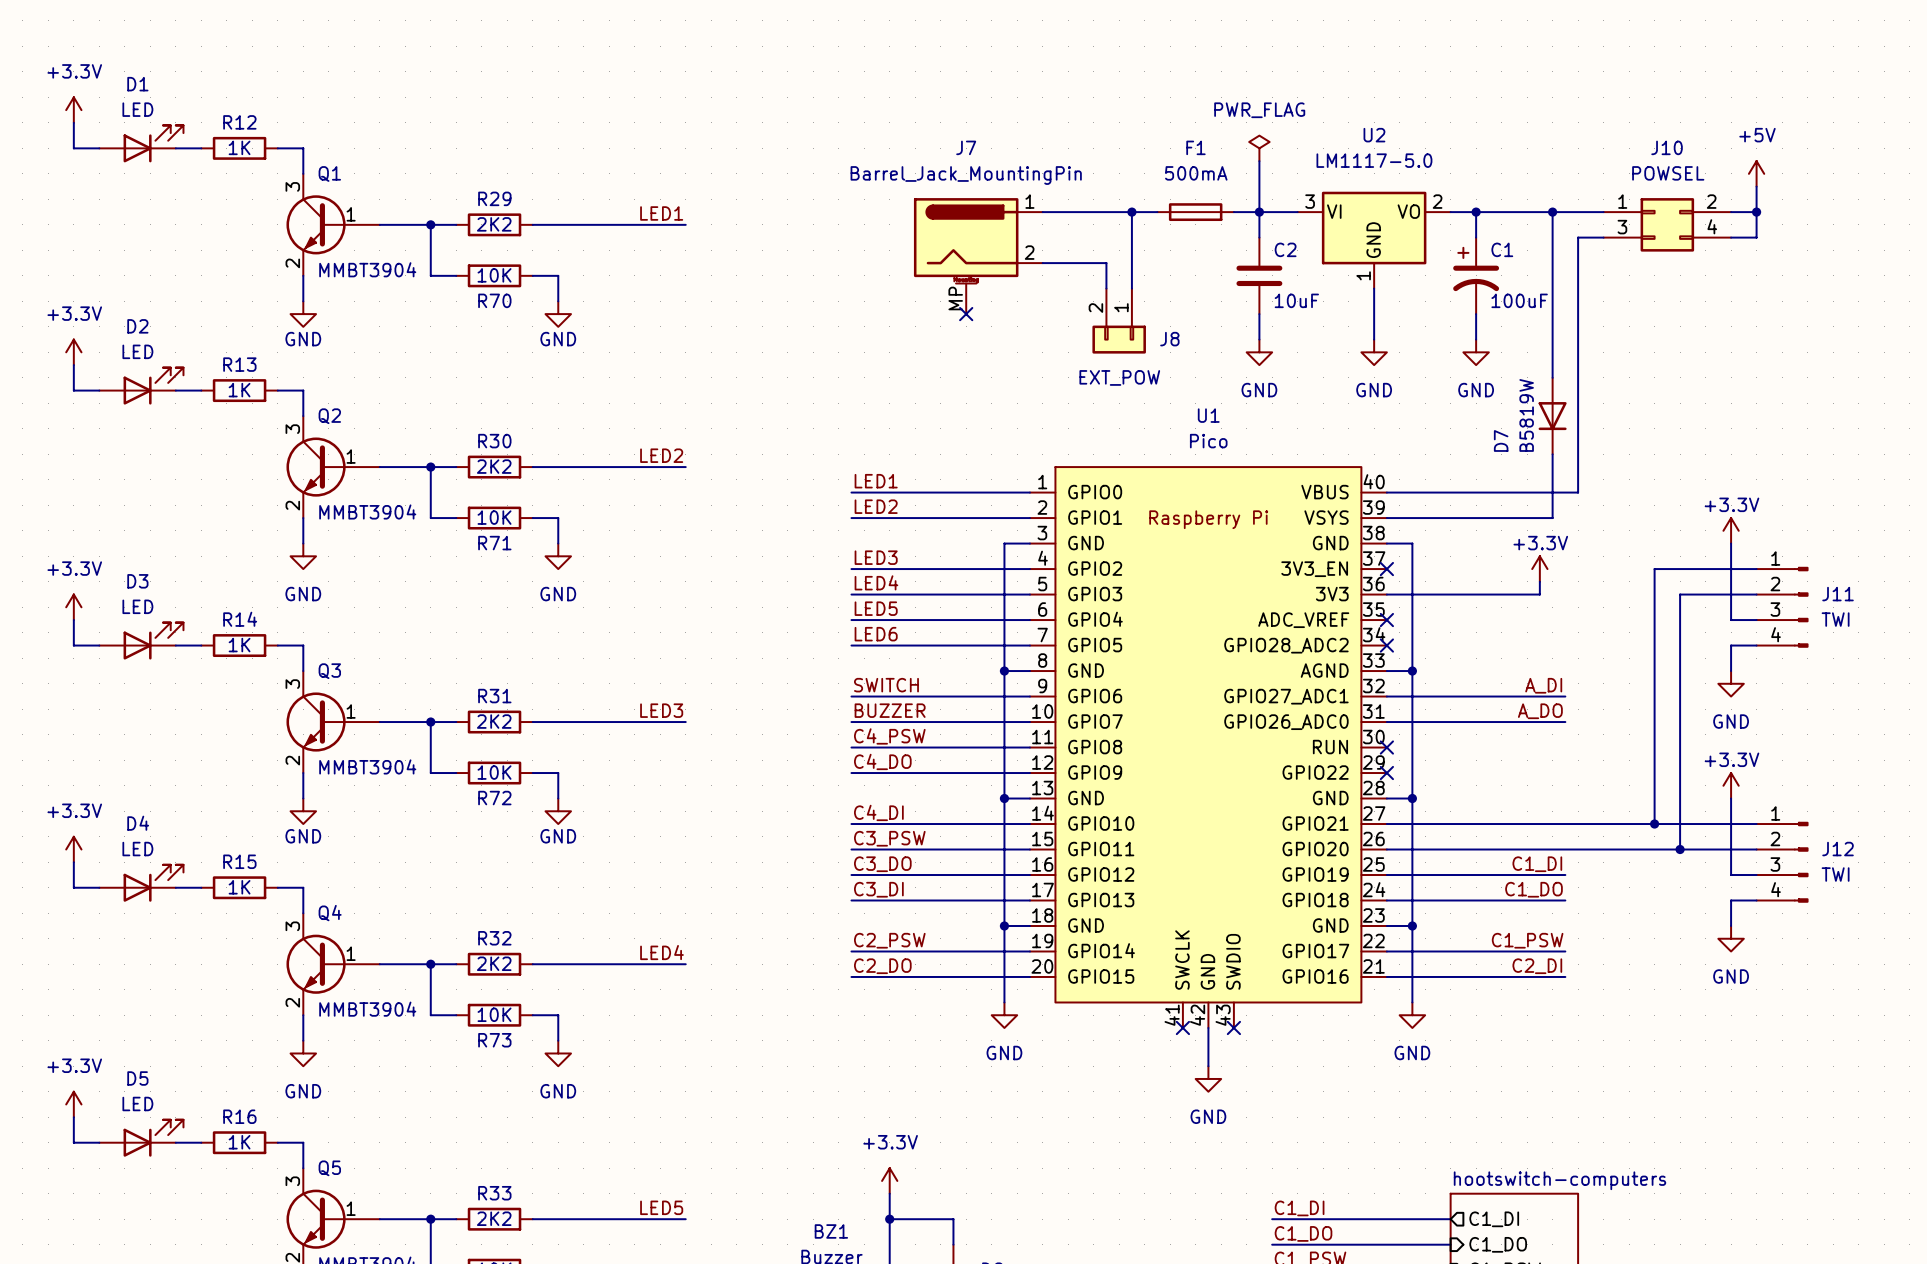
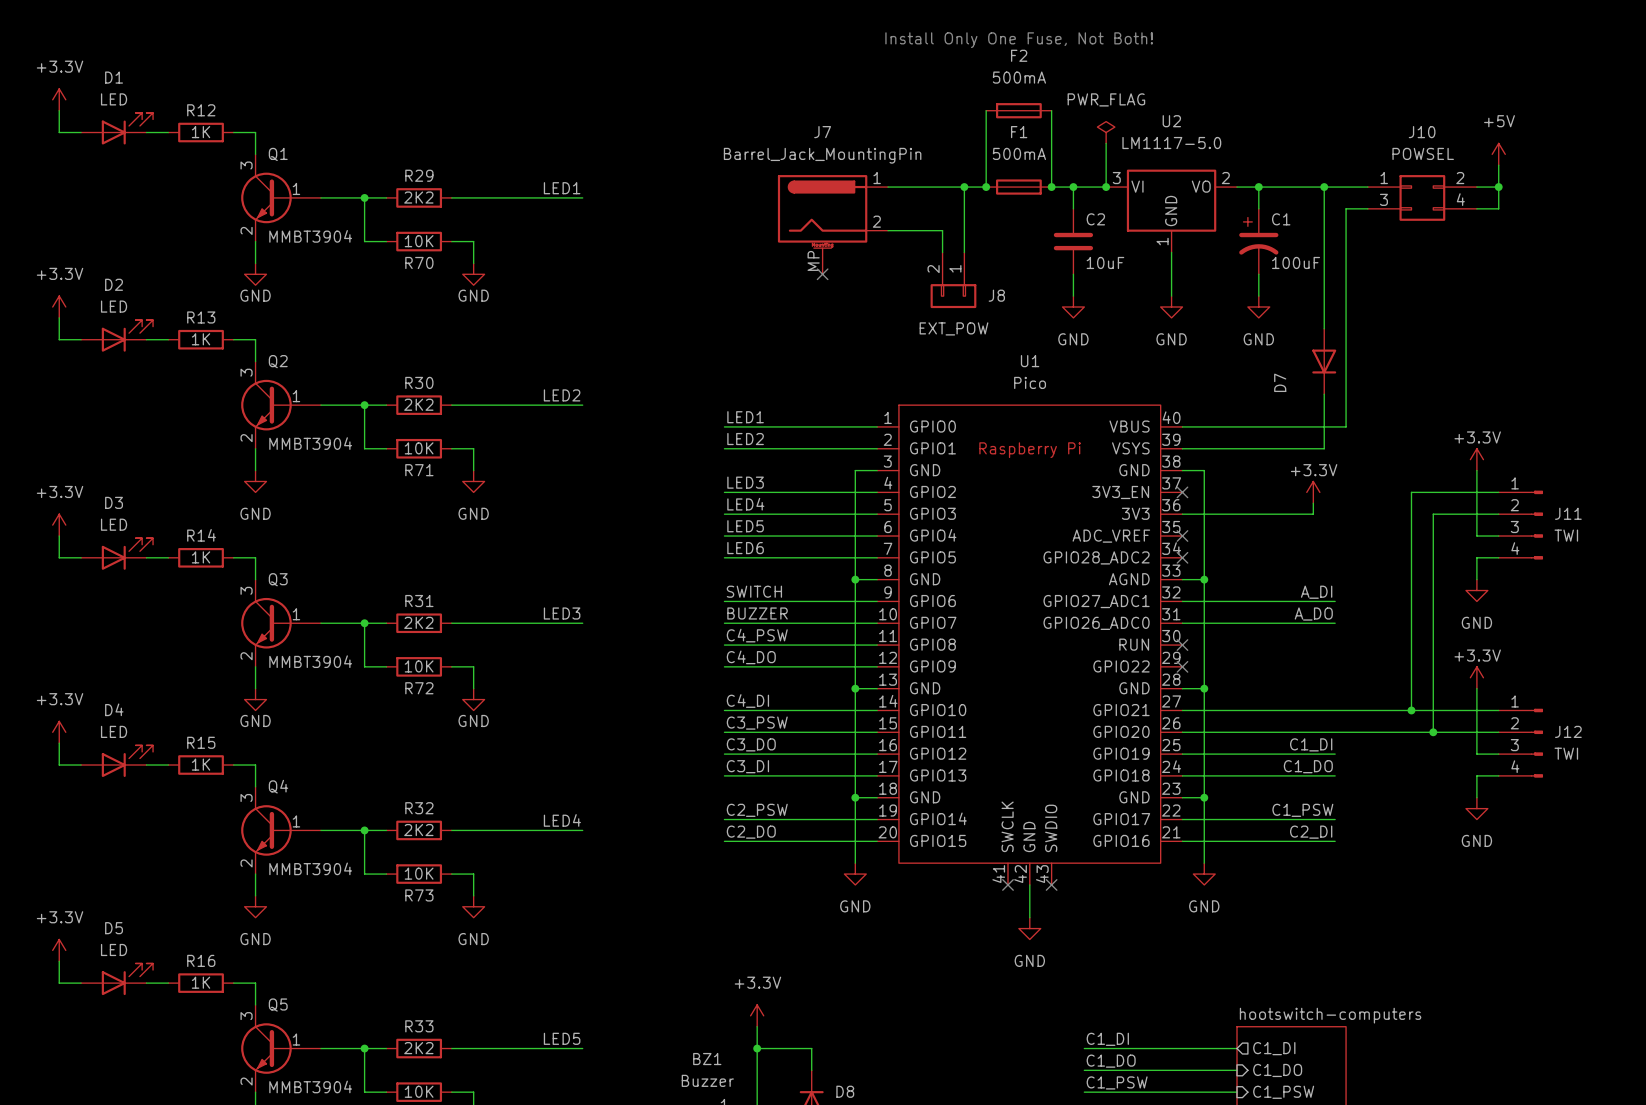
text: none -> Install Only One Fuse, Not Both! (1019, 40)
wire: none -> (986, 110) (986, 187)
F2: none -> 500mA (1018, 110)
wire: none -> (1051, 110) (1051, 187)
power symbol position: PWR_FLAG (1259, 148) -> PWR_FLAG (1106, 132)
wire: (1259, 161) (1259, 212) -> (1106, 143) (1106, 187)
junction: none -> (986, 187)
junction: none -> (1051, 187)
junction: none -> (1106, 187)
D7 value: B5819W (1526, 415) -> none

